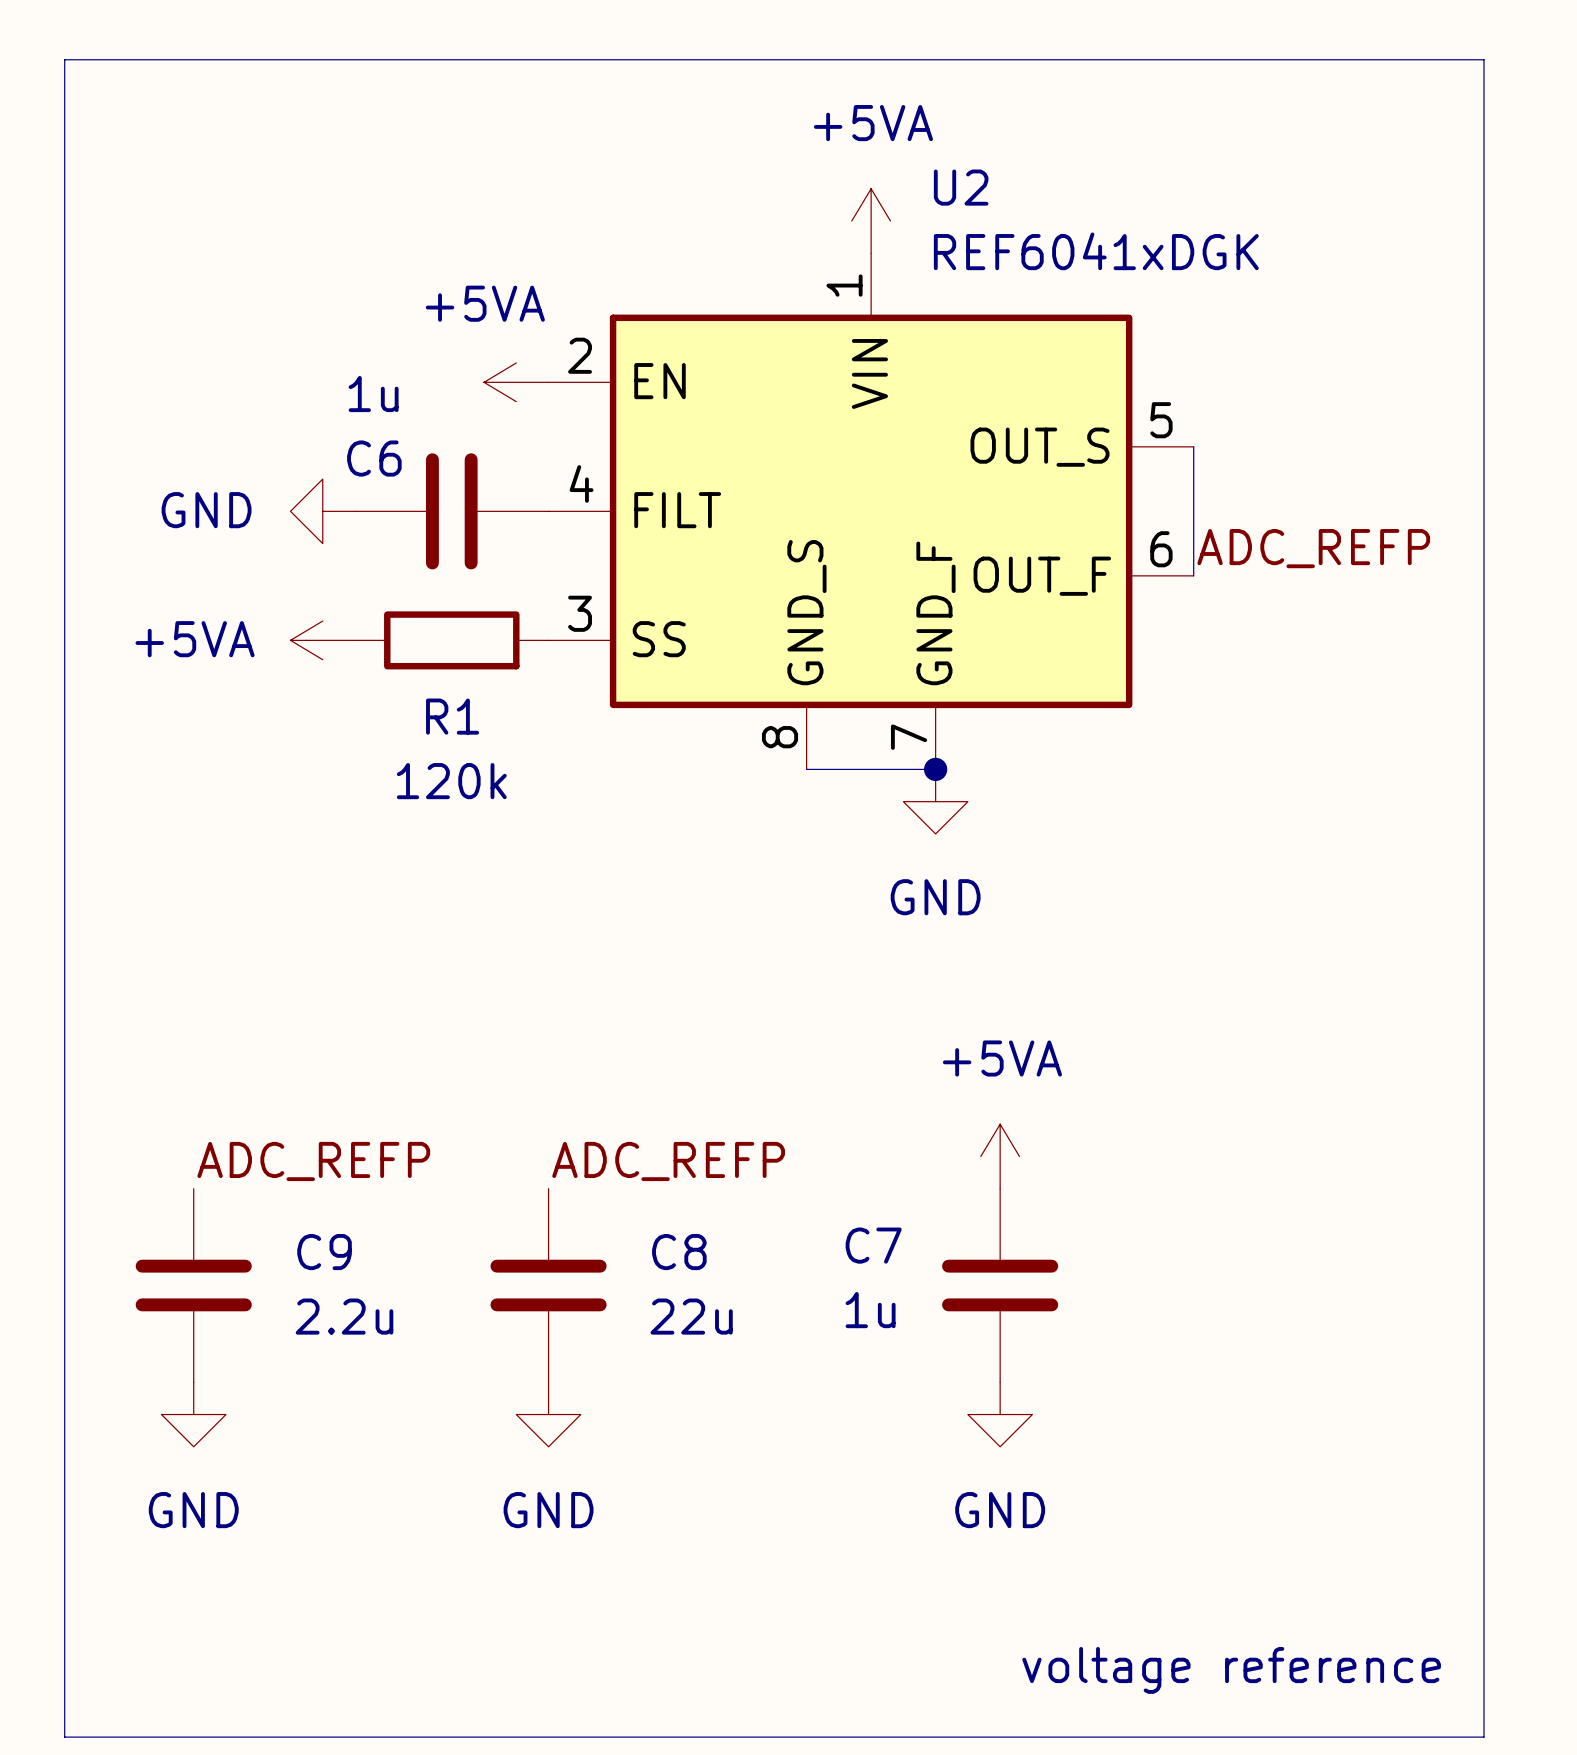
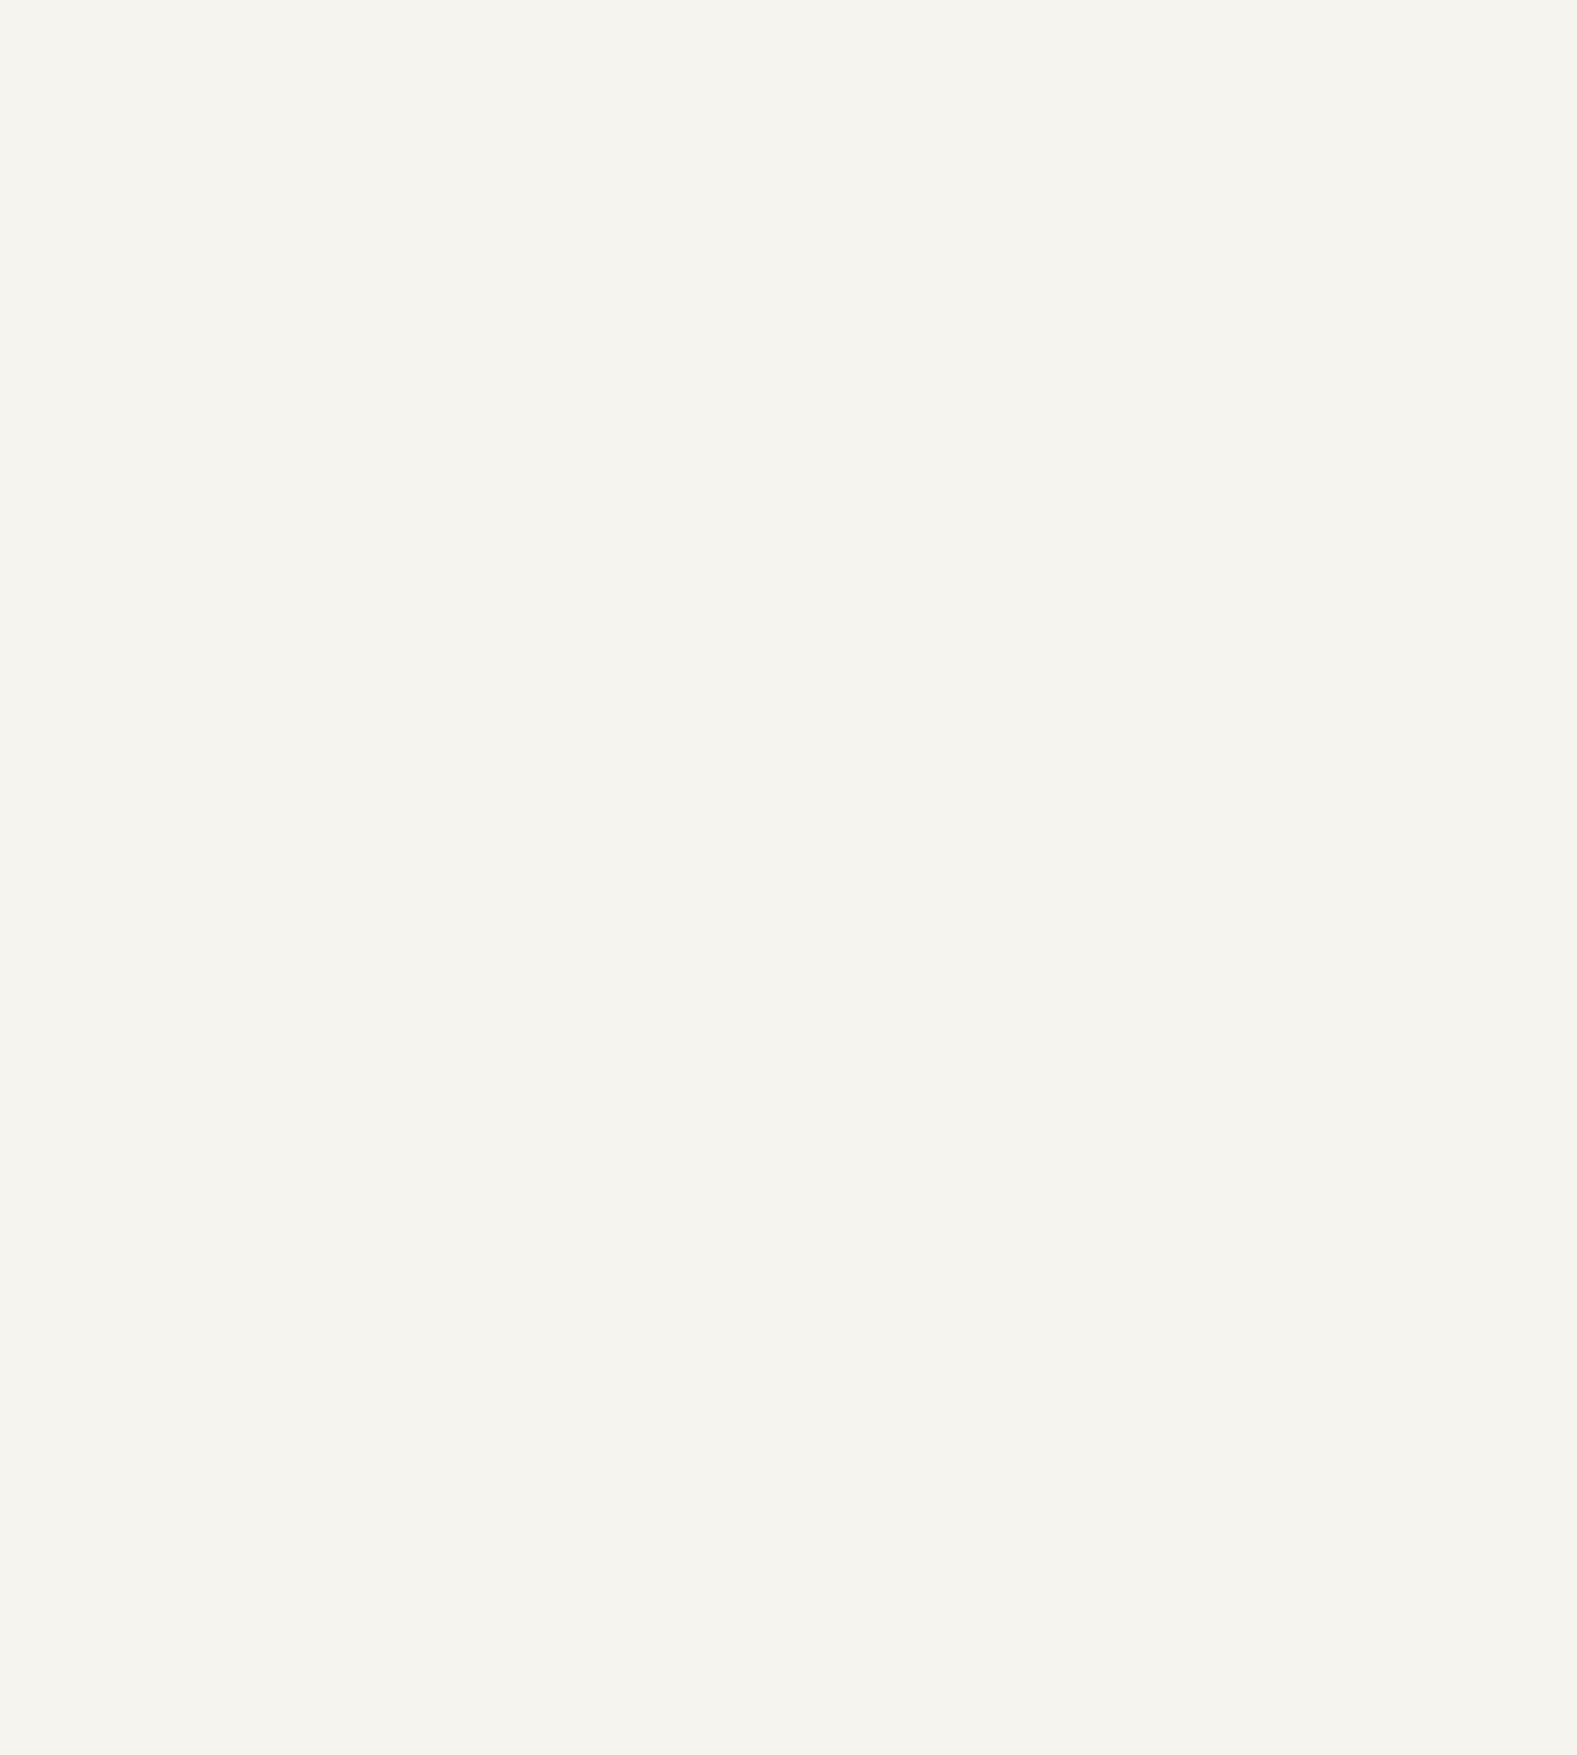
line: (64, 59) (1484, 59) (1484, 1737) (64, 1737) (64, 59) -> none
power symbol: +5VA (871, 221) -> none
power symbol: +5VA (516, 382) -> none
wire: (1193, 446) (1193, 575) -> none
power symbol: GND (322, 511) -> none
C6: 1u (451, 511) -> none
U2: REF6041xDGK (871, 511) -> none
label: ADC_REFP (1313, 548) -> none
power symbol: +5VA (322, 640) -> none
R1: 120k (451, 640) -> none
wire: (806, 769) (935, 769) -> none
junction: (935, 769) -> none
power symbol: GND (935, 801) -> none
power symbol: +5VA (1000, 1156) -> none
label: ADC_REFP (313, 1161) -> none
label: ADC_REFP (668, 1161) -> none
C9: 2.2u (193, 1285) -> none
C8: 22u (548, 1285) -> none
C7: 1u (1000, 1285) -> none
power symbol: GND (193, 1414) -> none
power symbol: GND (548, 1414) -> none
power symbol: GND (1000, 1414) -> none
text: voltage reference (1231, 1670) -> none

